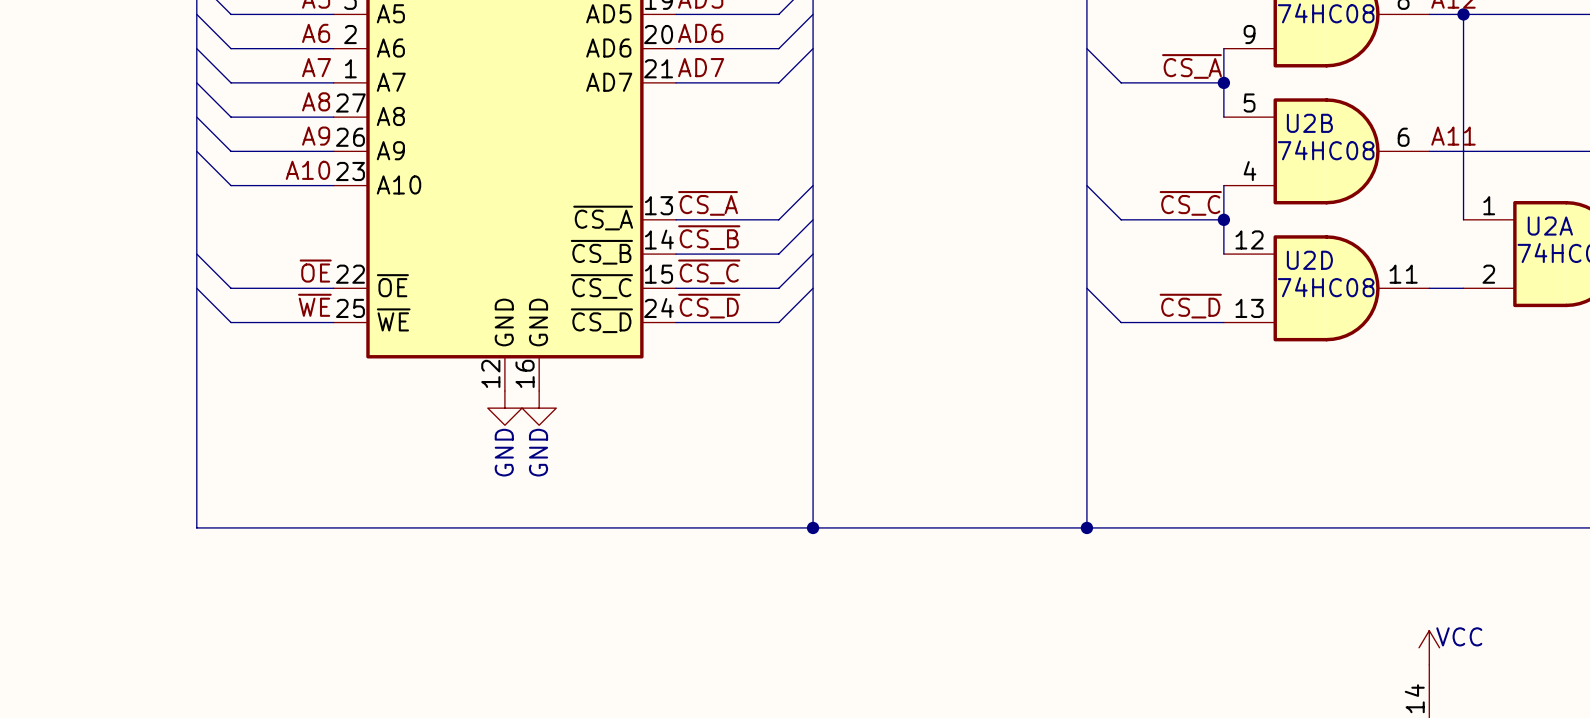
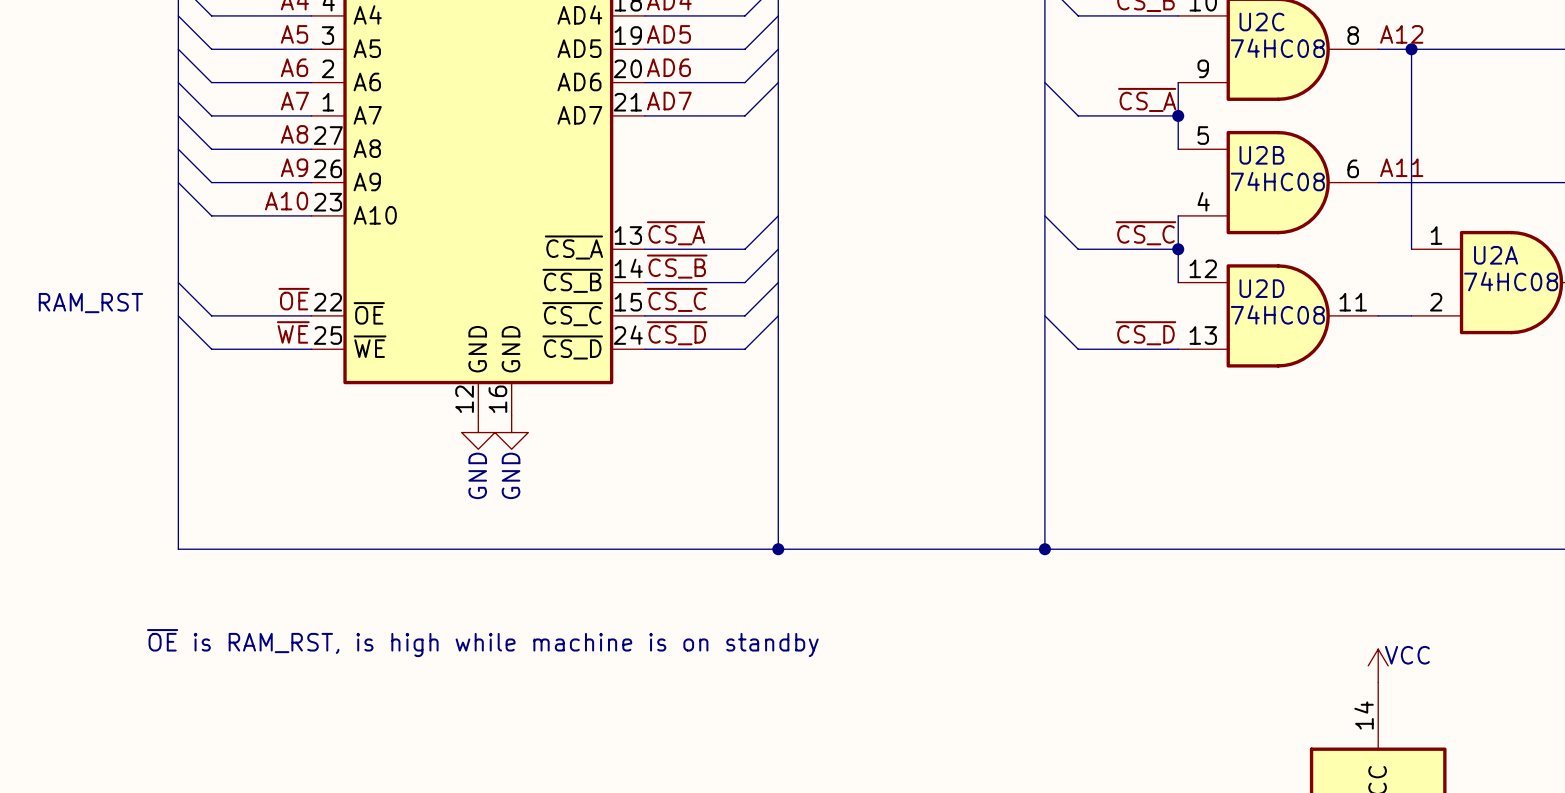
text: none -> RAM_RST (90, 303)
text: none -> ~{OE} is RAM_RST, is high while machine is on standby (482, 643)

